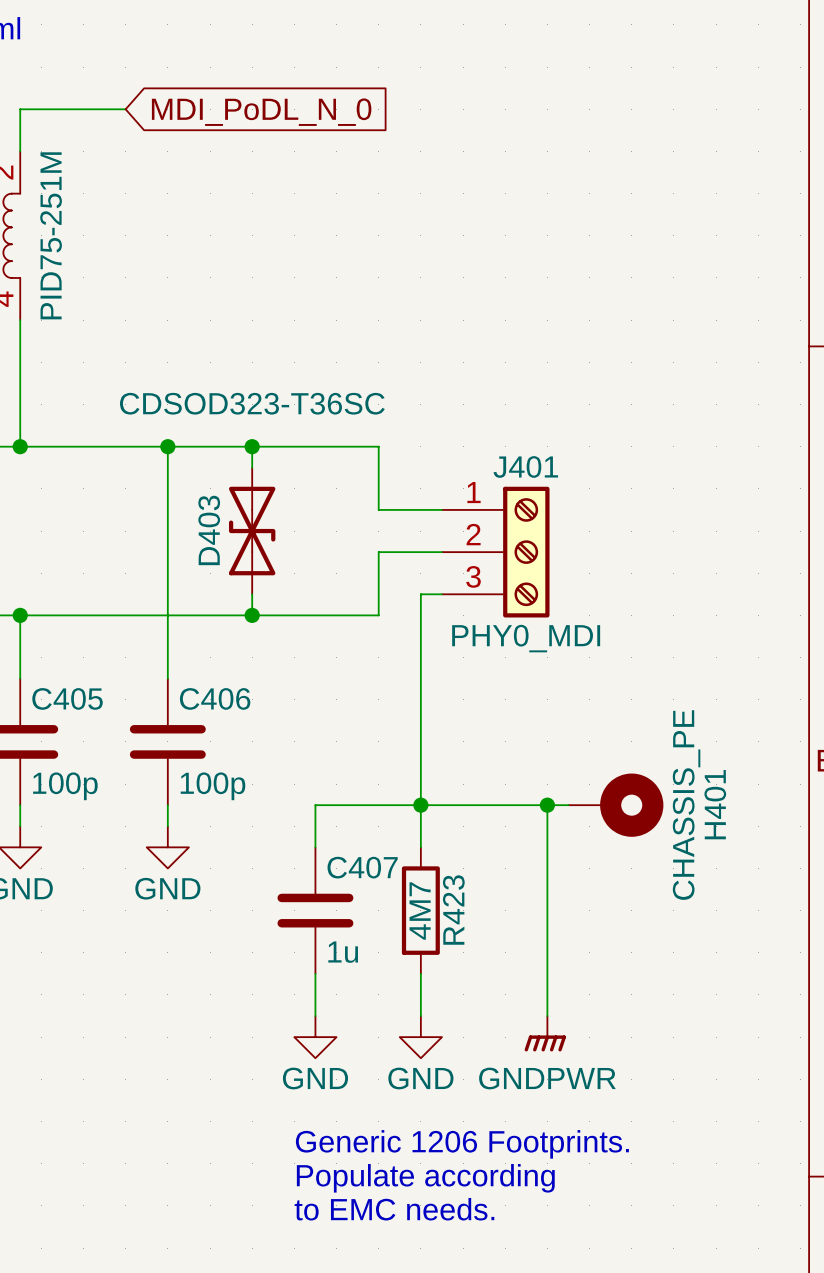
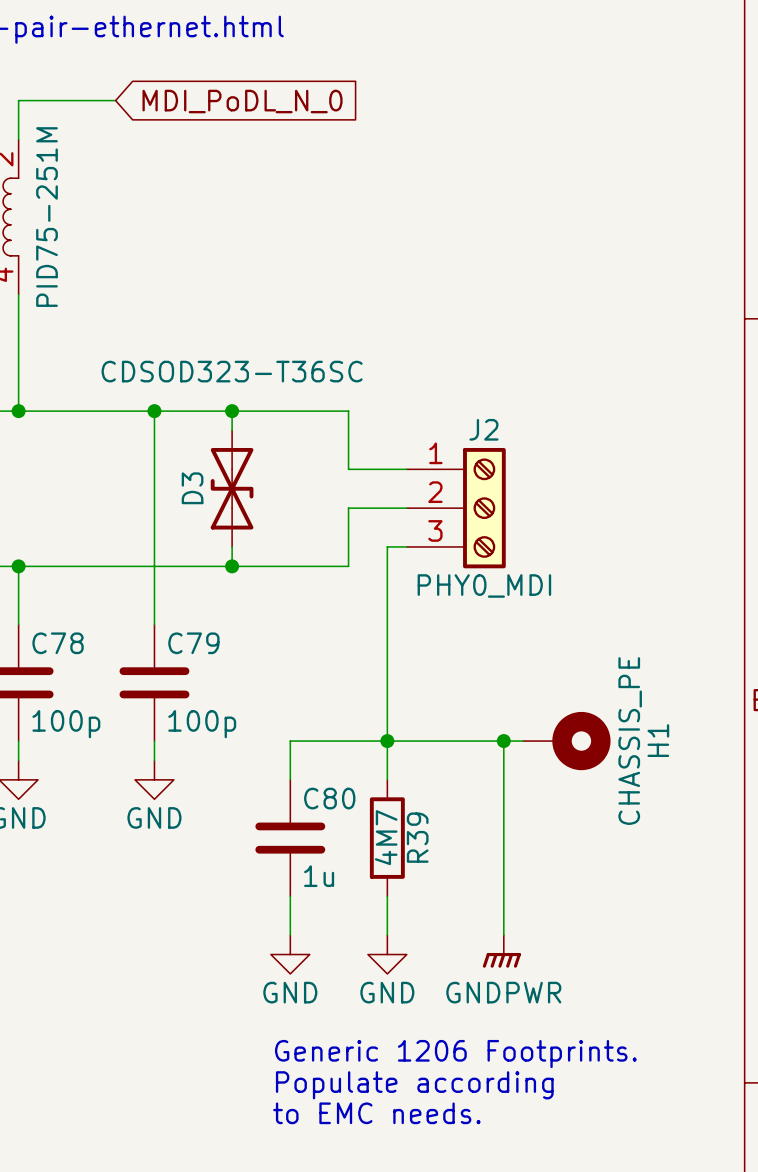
J401 name: J401 (525, 466) -> J2 (483, 429)
D403 name: D403 (209, 530) -> D3 (192, 488)
C405 name: C405 (67, 698) -> C78 (58, 643)
C406 name: C406 (215, 698) -> C79 (193, 643)
H401 name: H401 (715, 804) -> H1 (658, 740)
C407 name: C407 (362, 867) -> C80 (329, 798)
R423 name: R423 (453, 910) -> R39 (417, 837)

